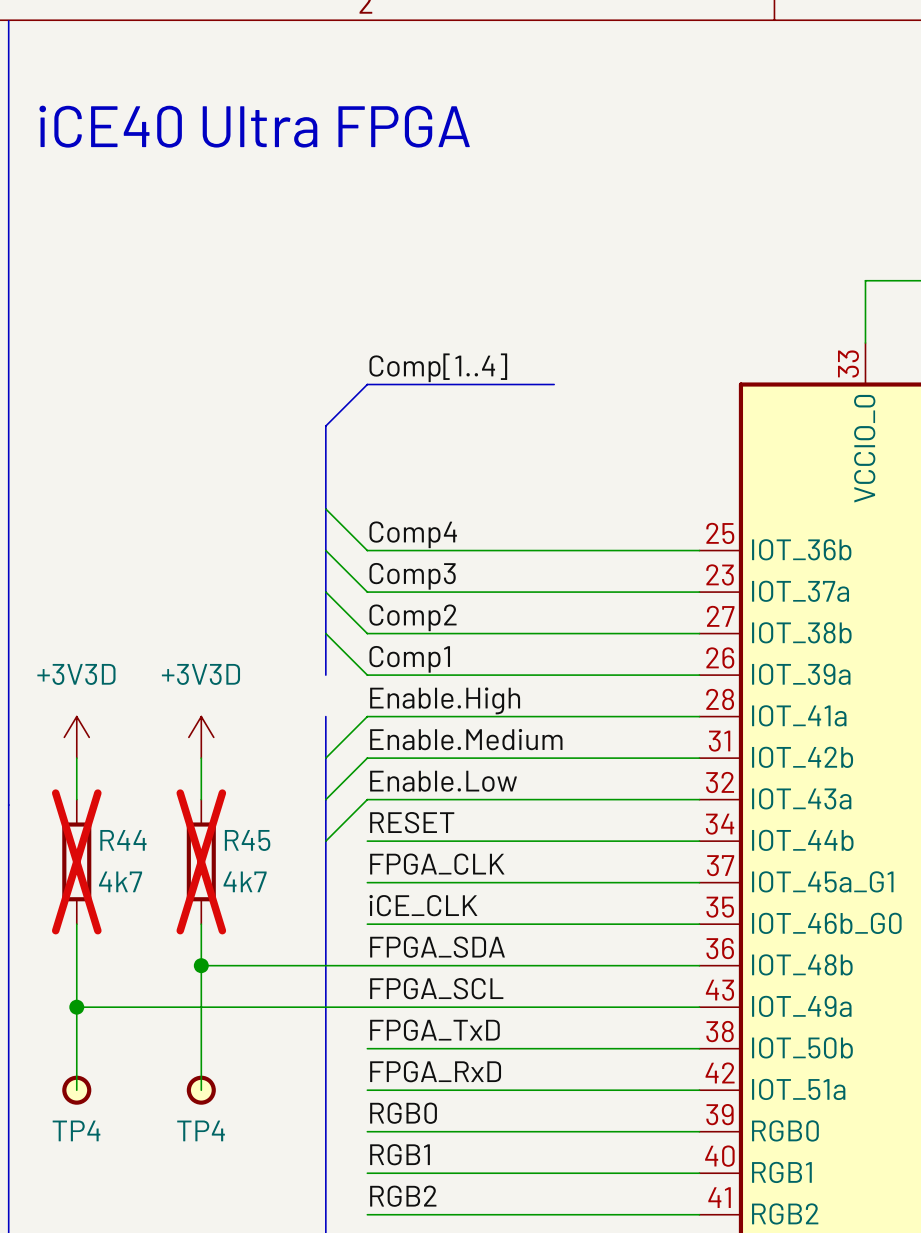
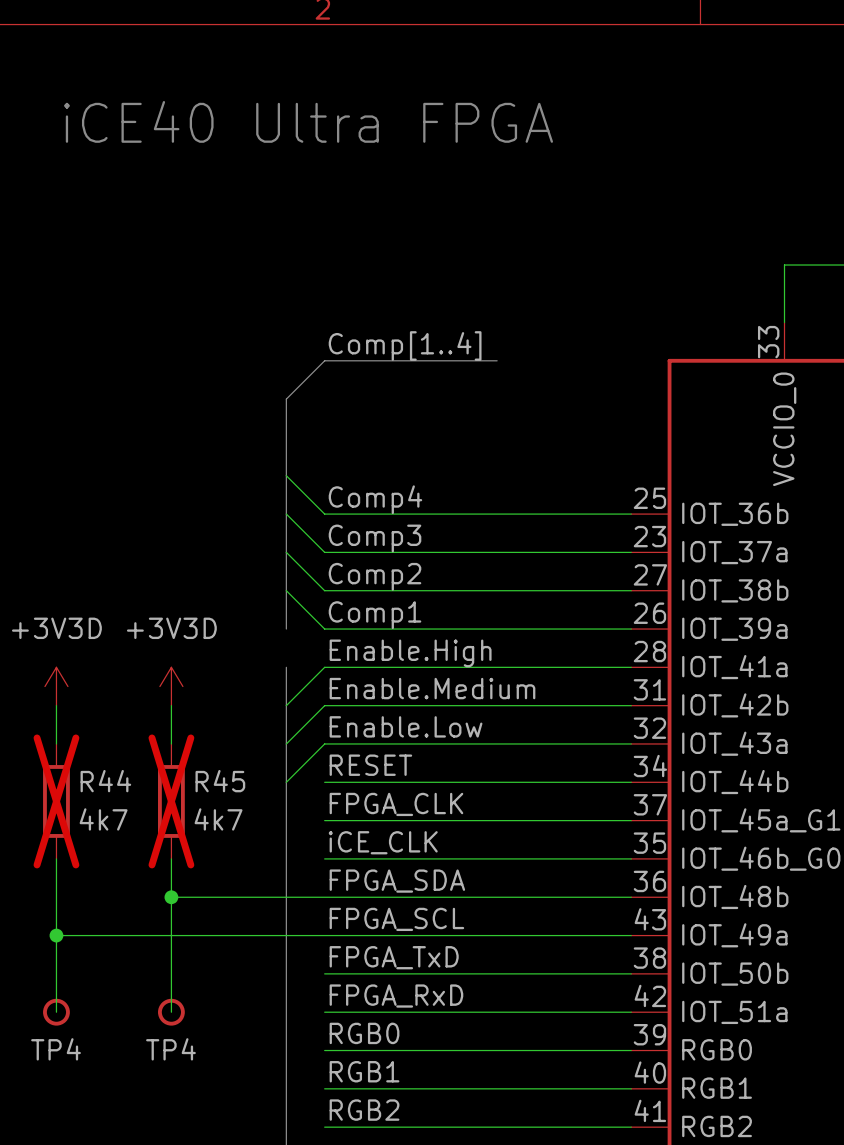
text position: iCE40 Ultra FPGA (254, 126) -> iCE40 Ultra FPGA (308, 121)

